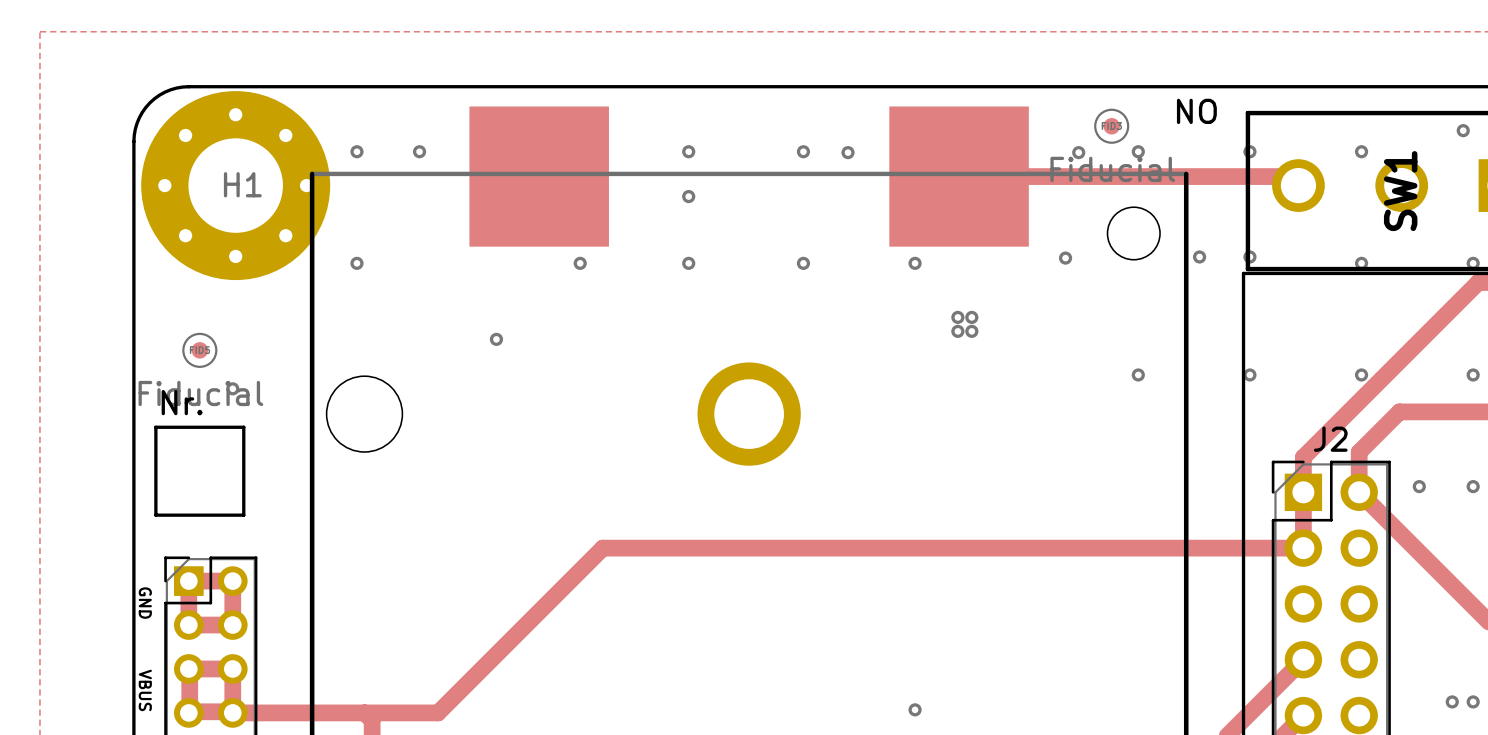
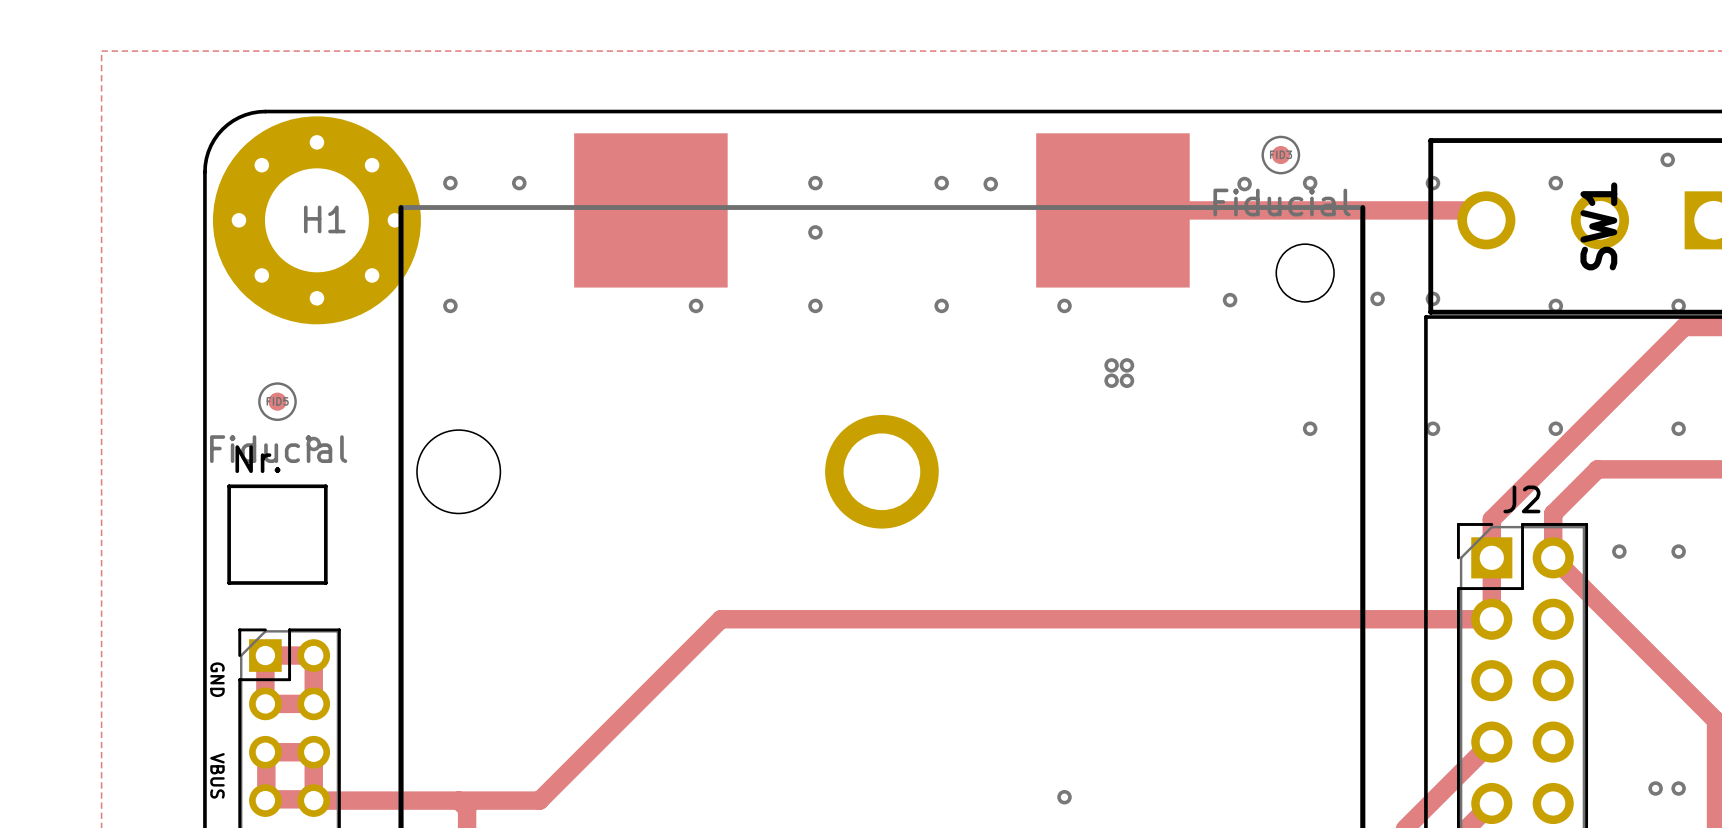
text: ON (1196, 111) -> none
via: (496, 339) -> none

